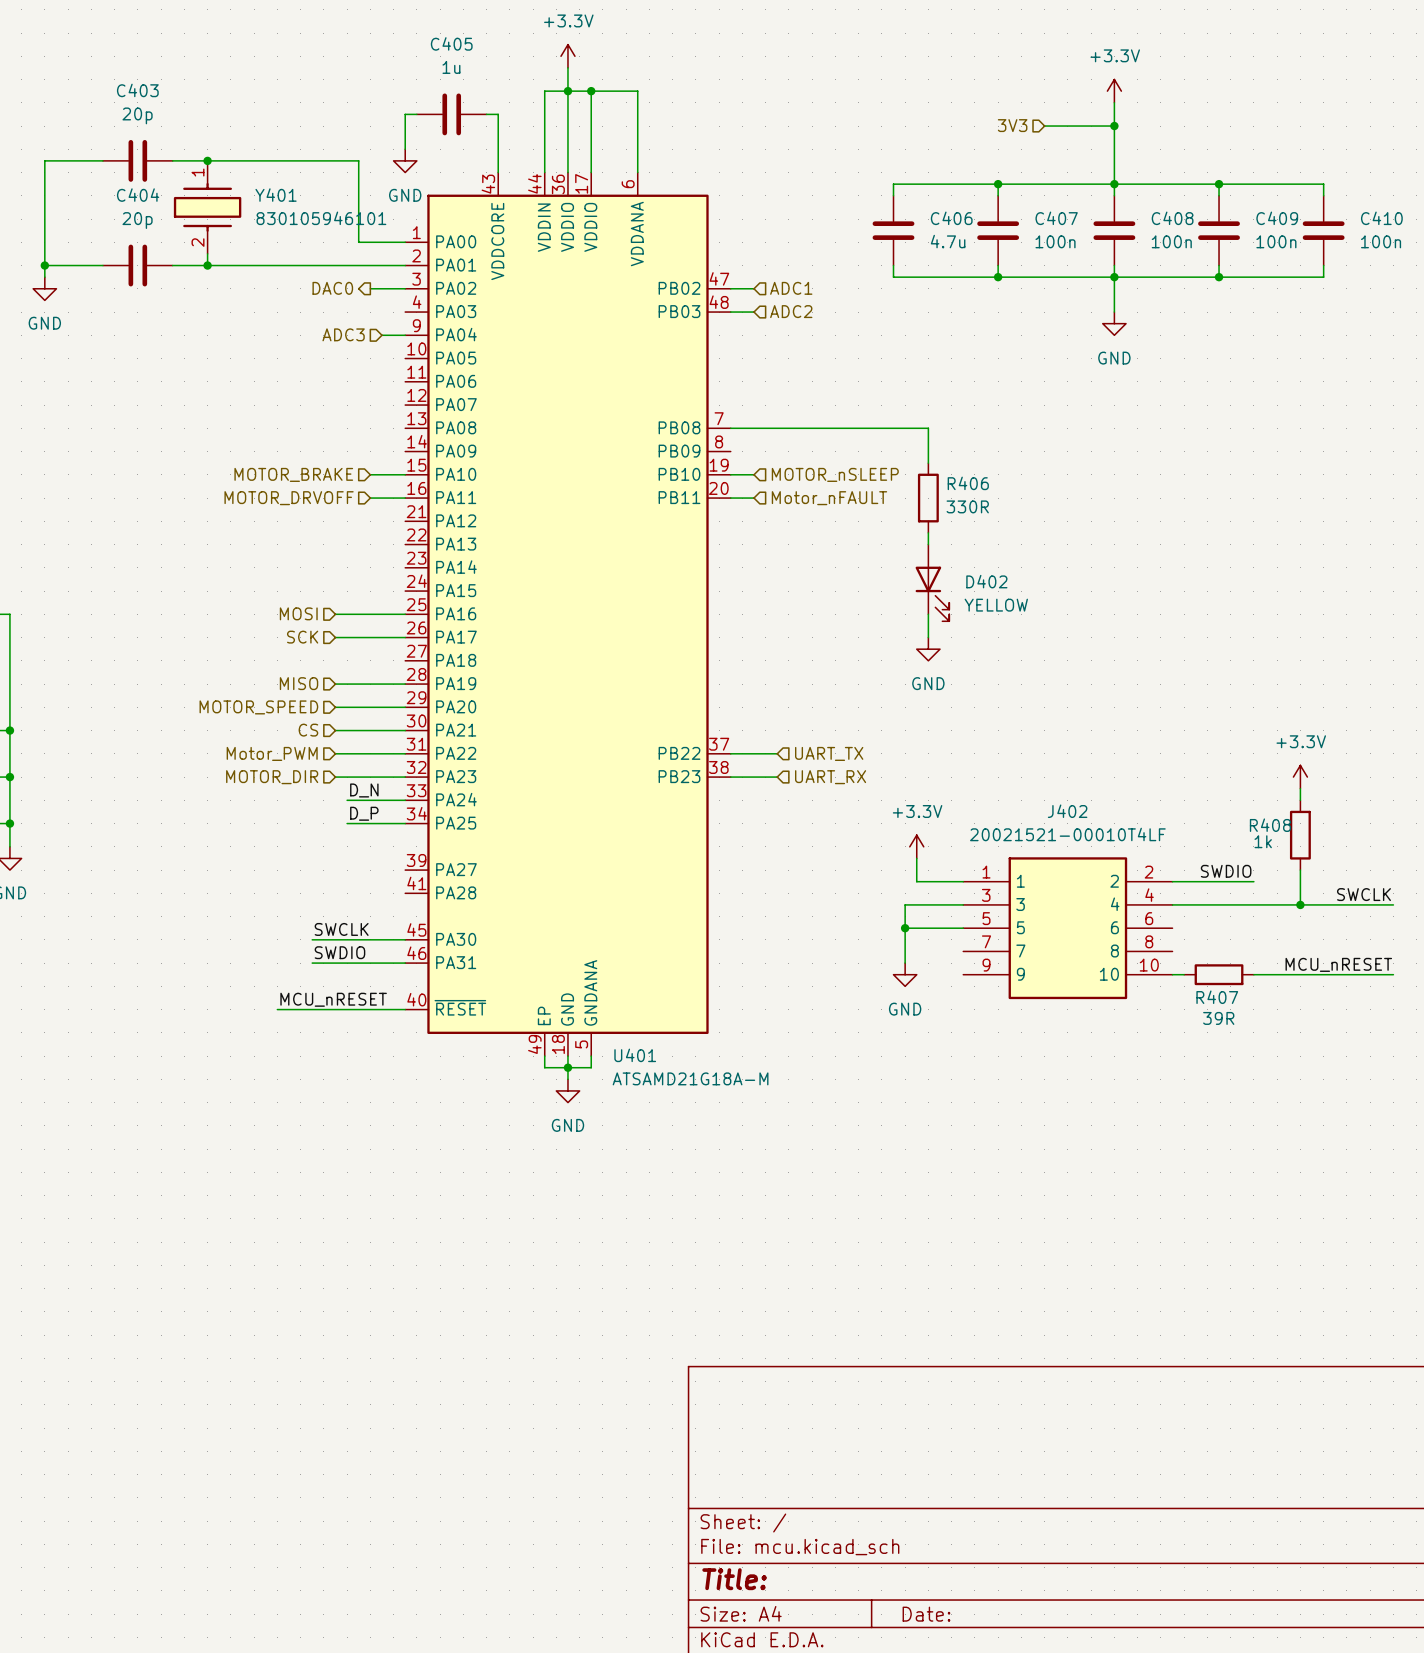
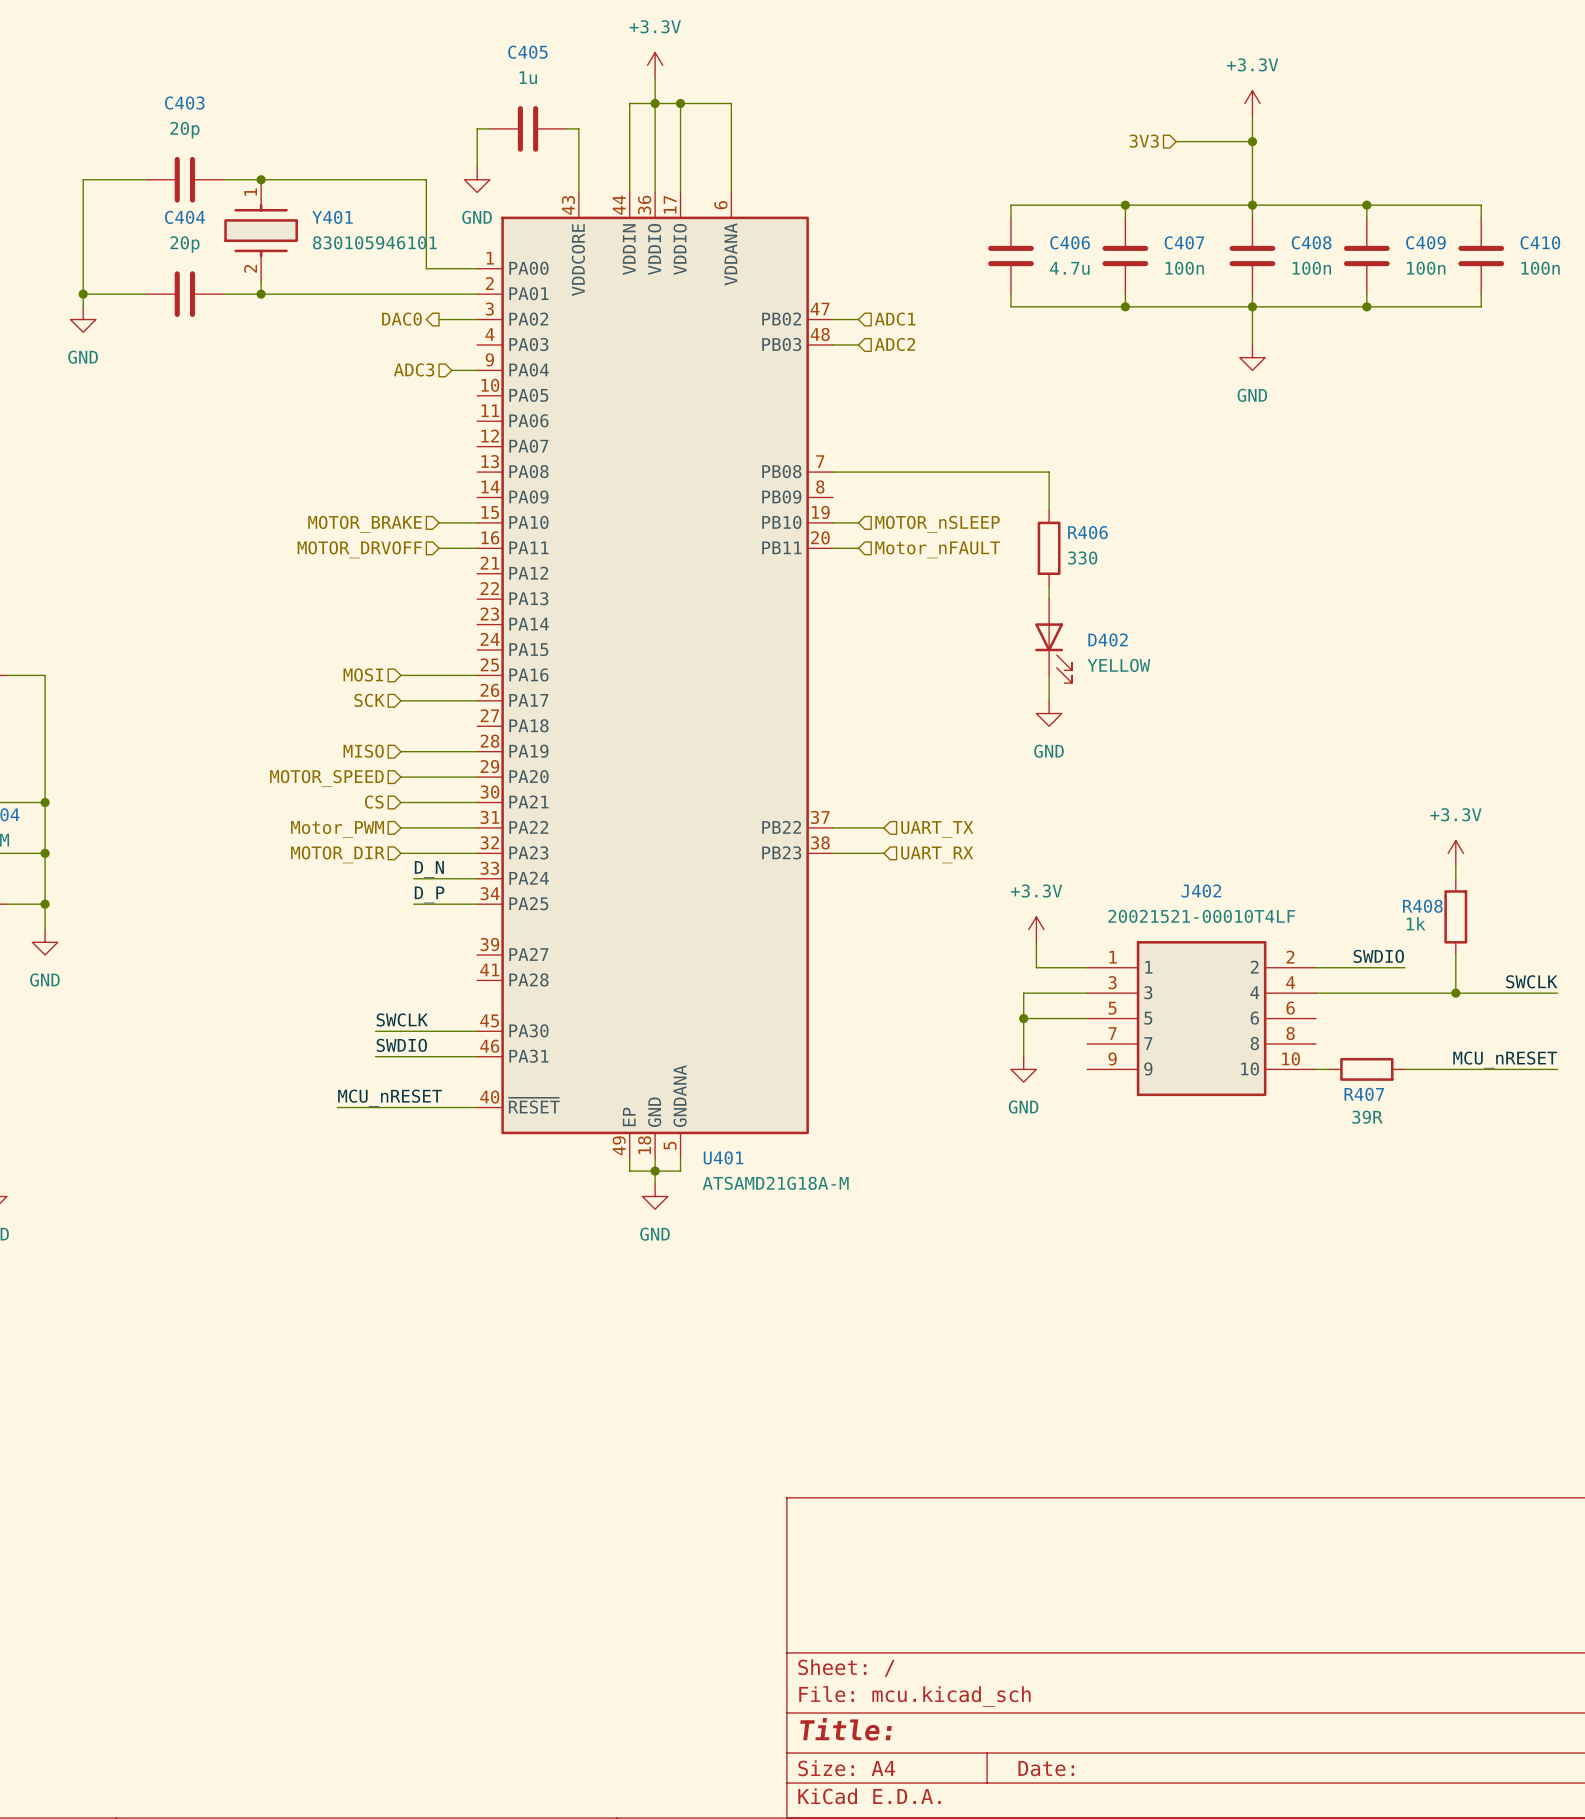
R406 value: 330R (967, 506) -> 330 (1082, 558)

